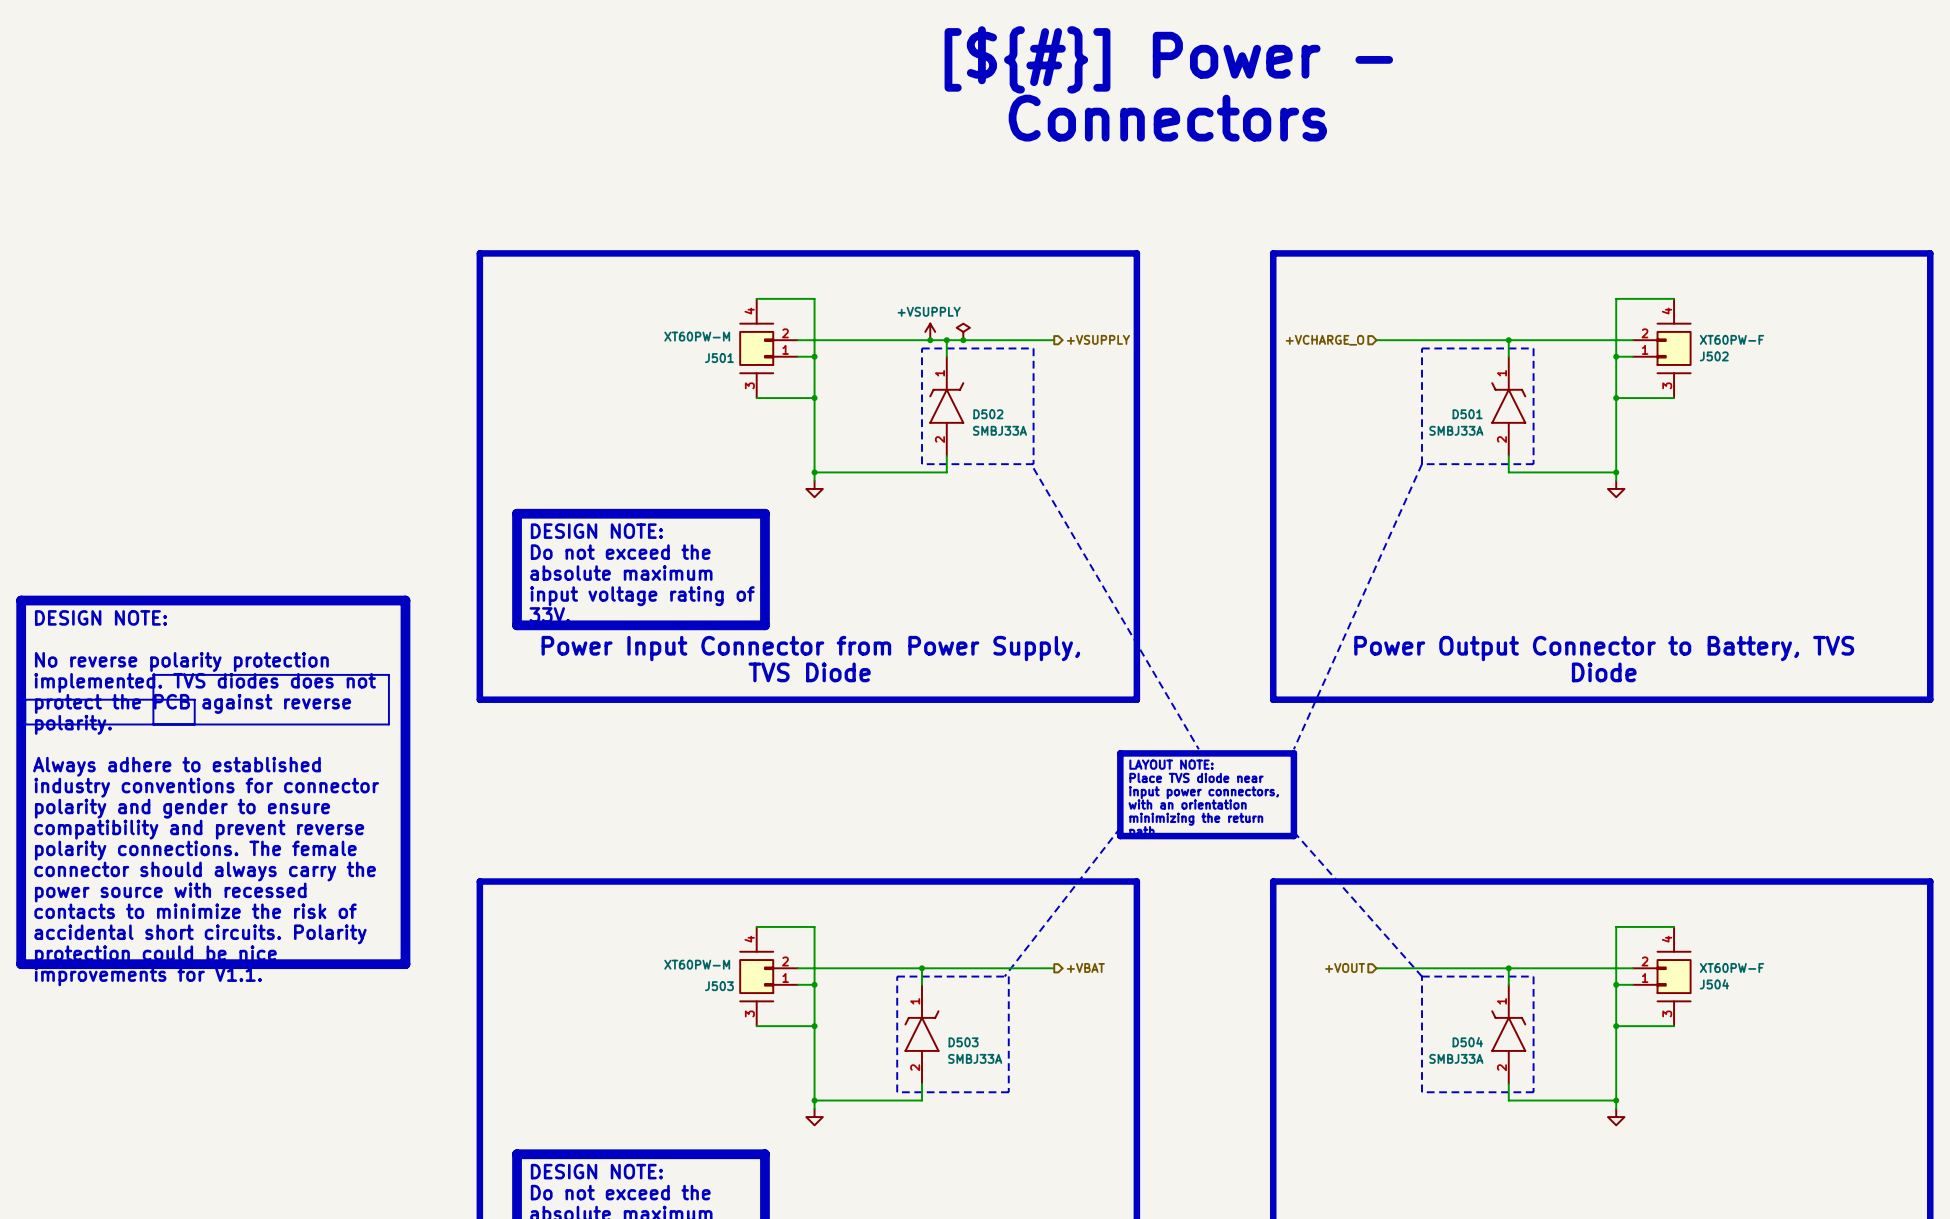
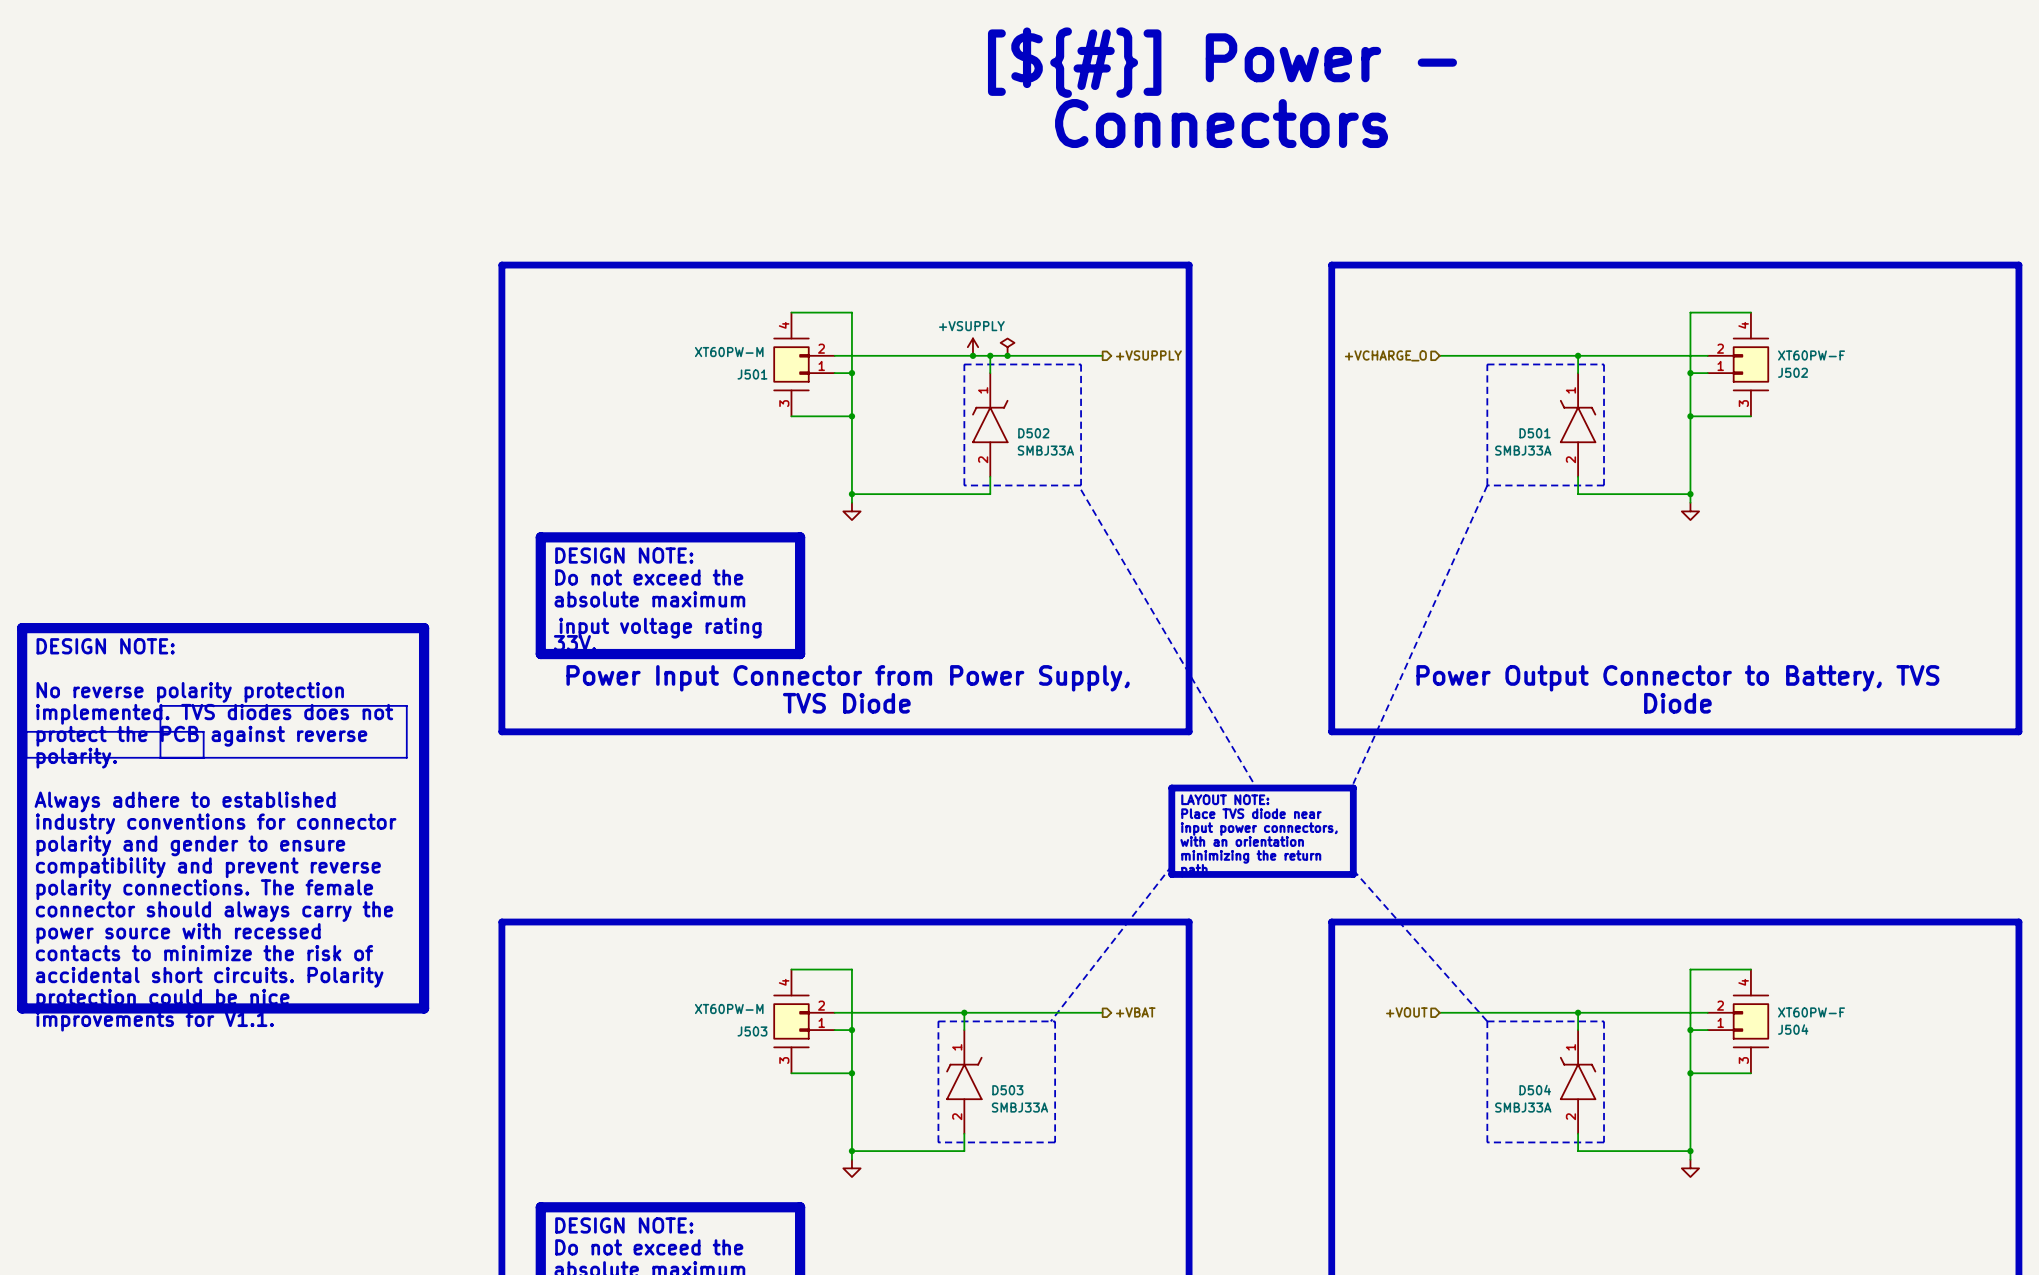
text: input voltage rating of (642, 596) -> input voltage rating (660, 628)

